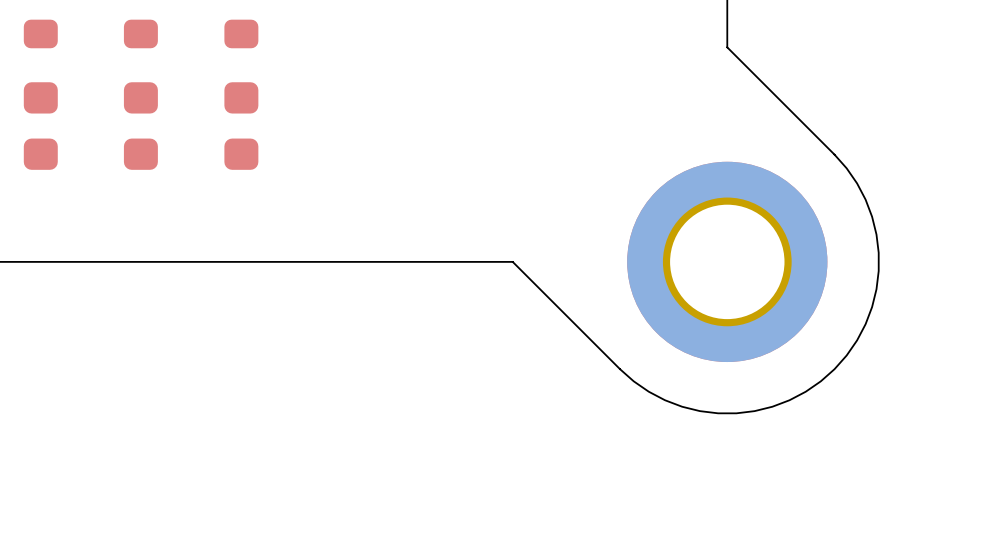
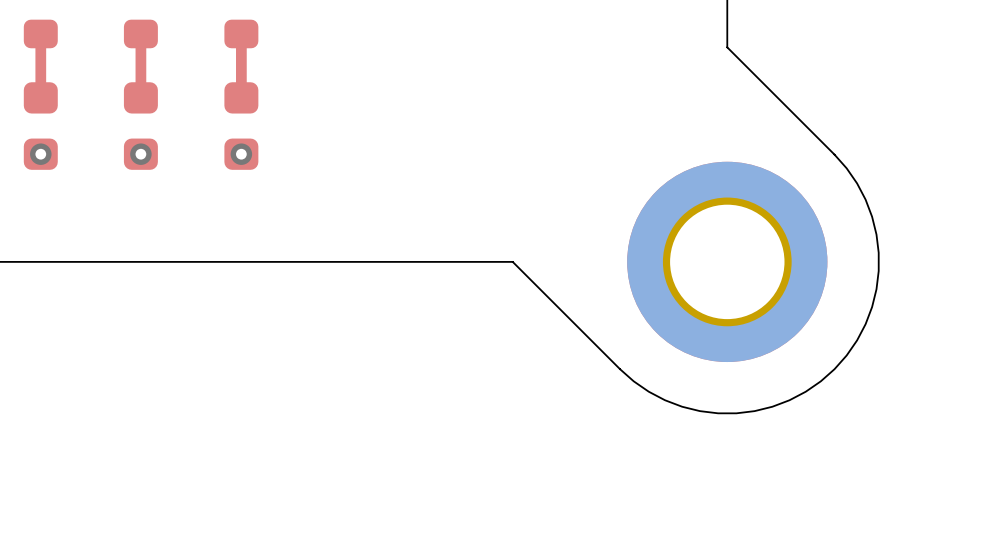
top track: none -> (40, 33) (40, 97)
top track: none -> (140, 33) (140, 97)
top track: none -> (241, 33) (241, 97)
via: none -> (40, 154)
via: none -> (140, 154)
via: none -> (241, 154)

